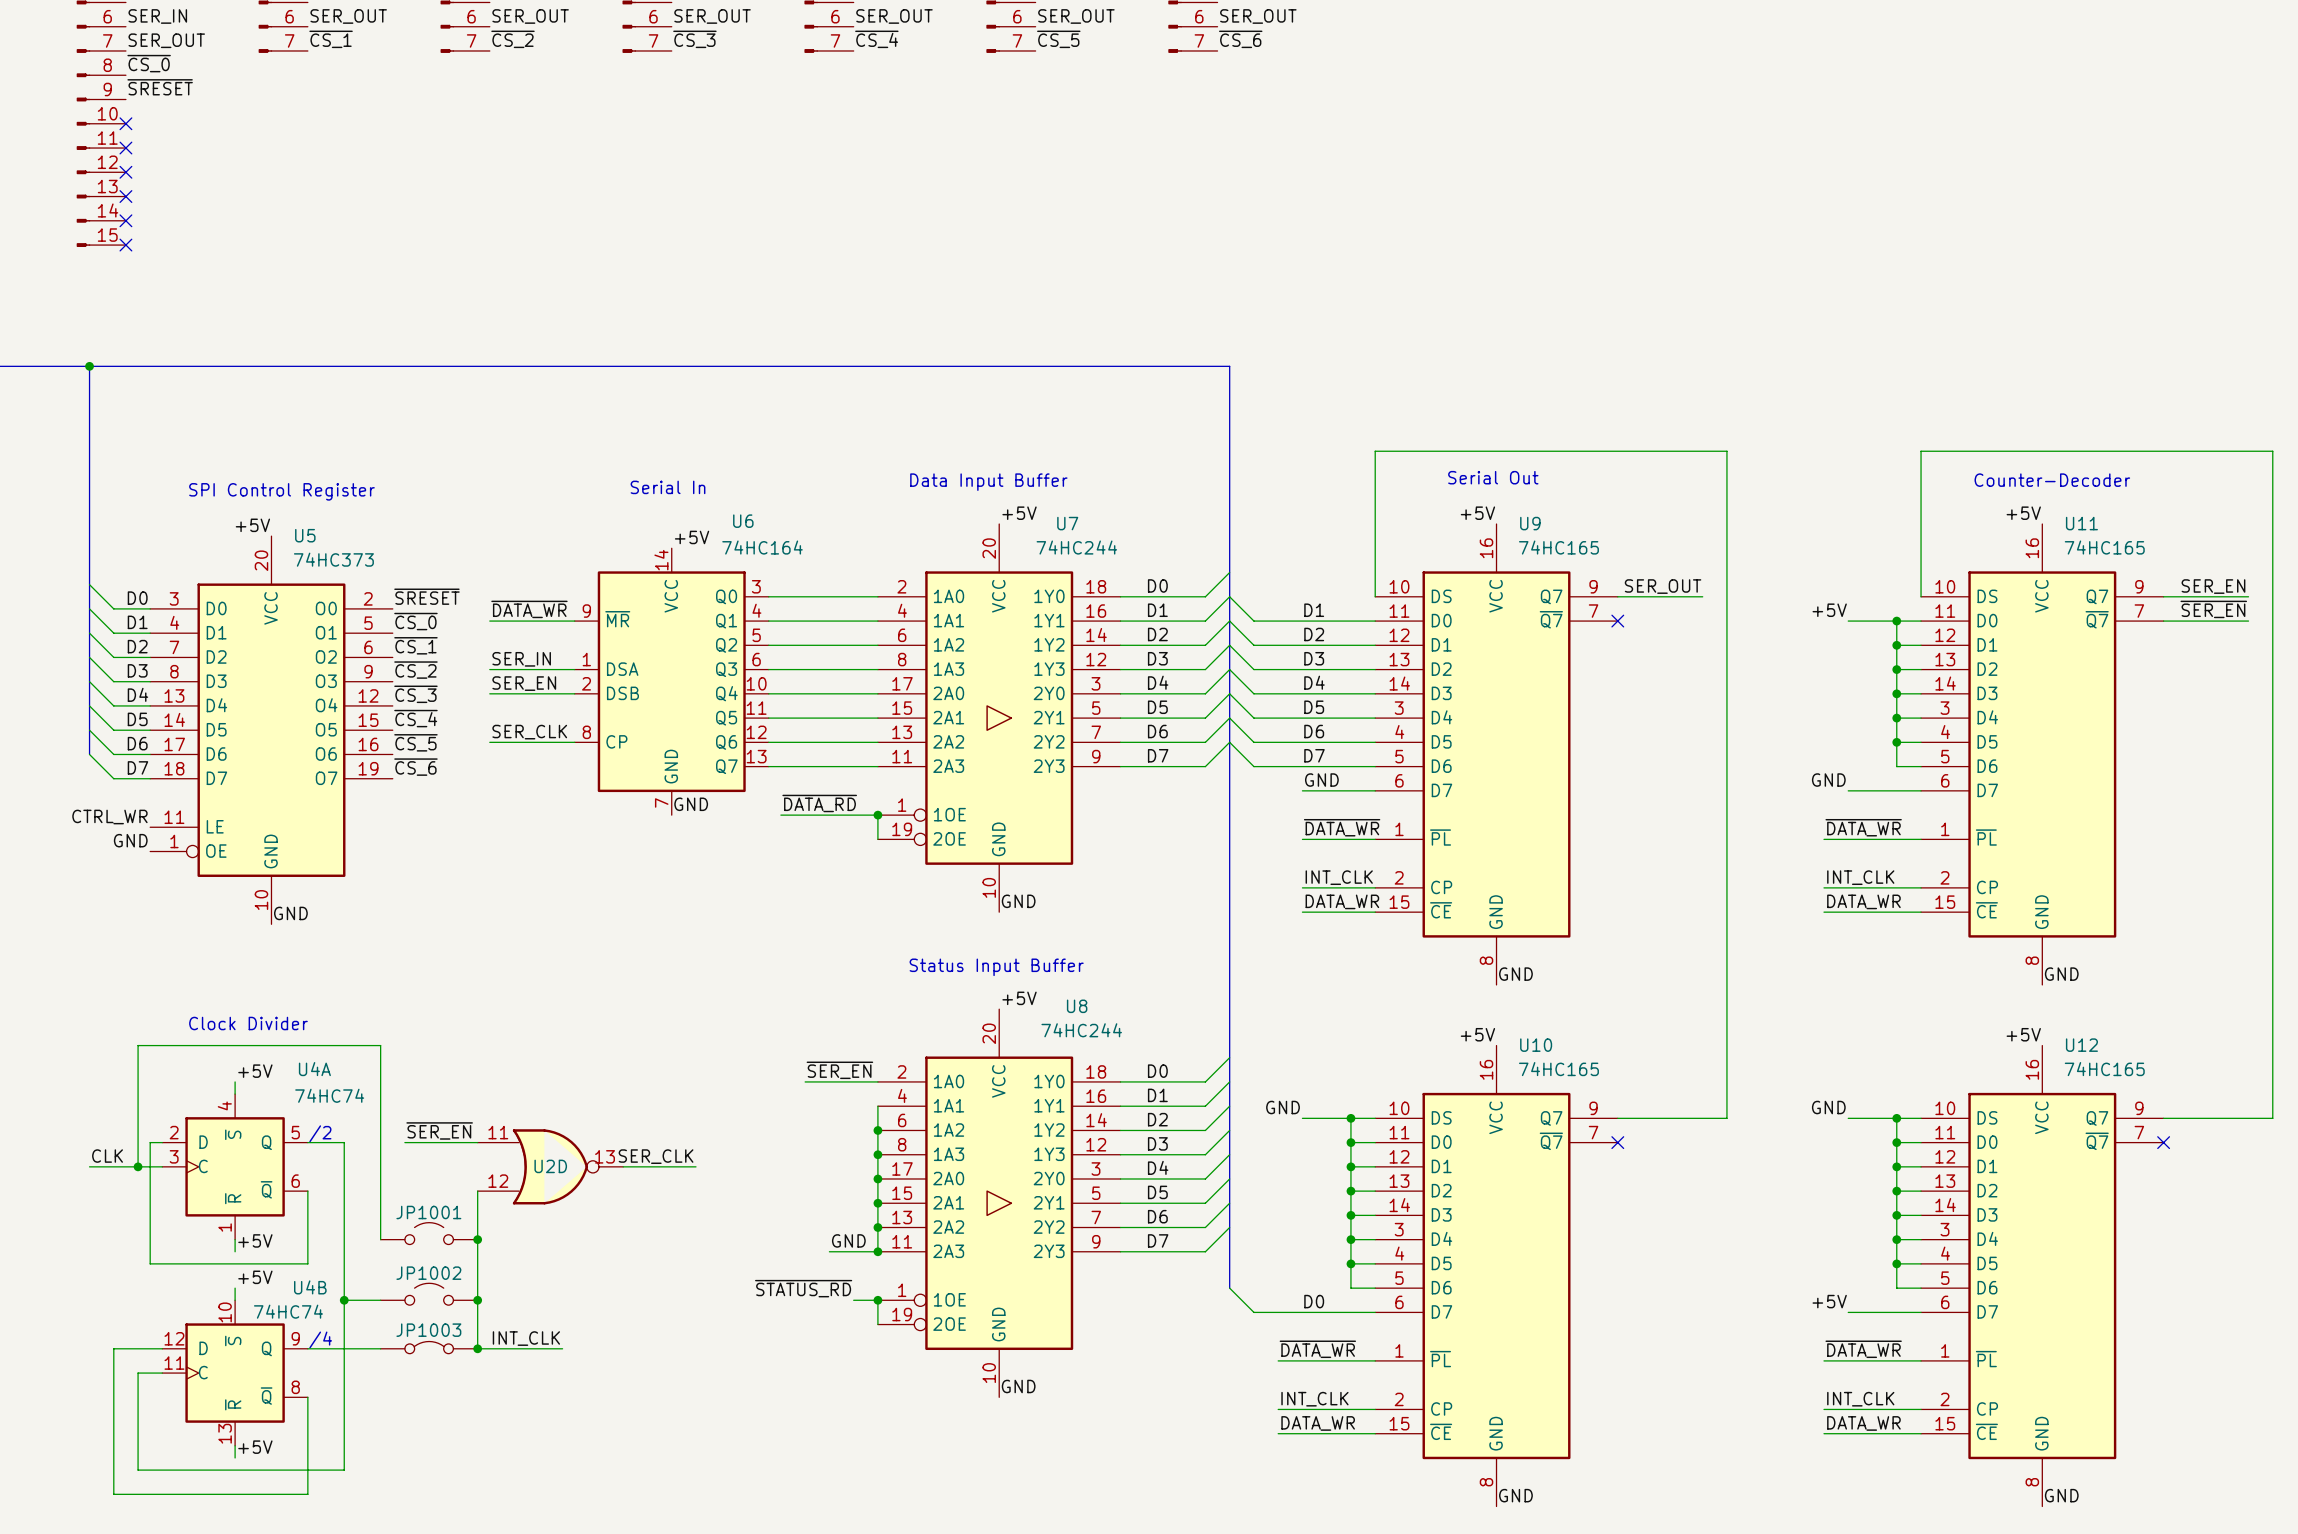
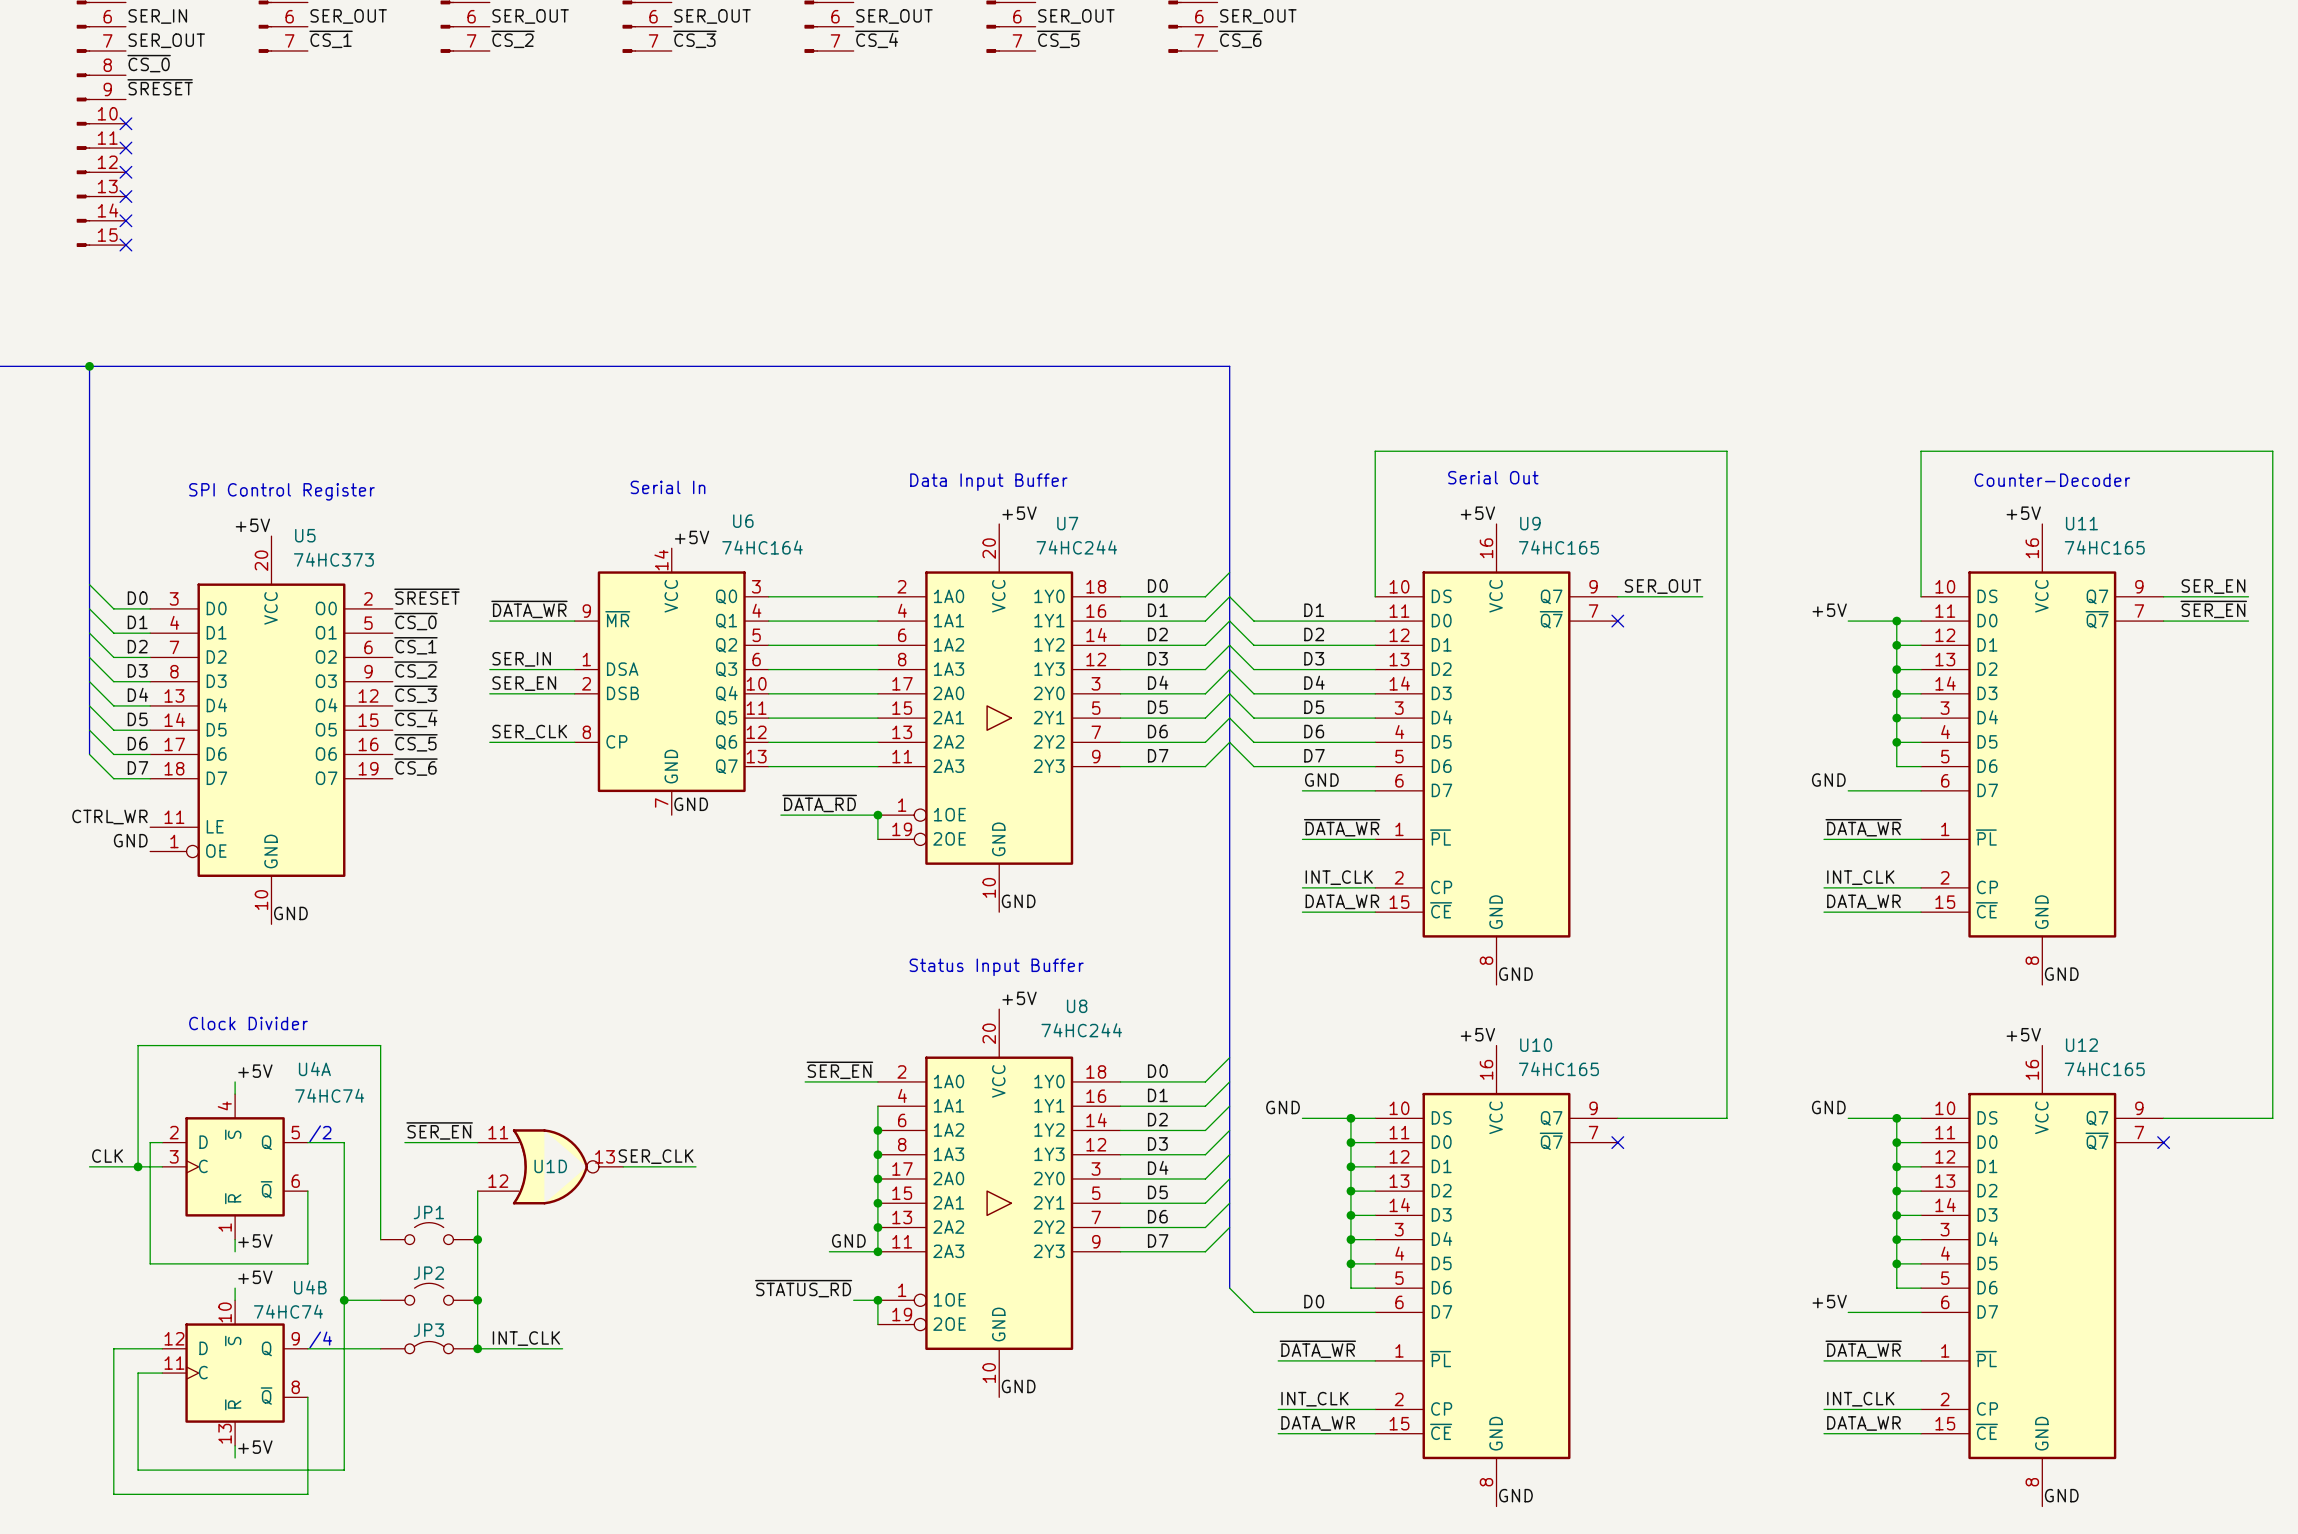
U2D name: U2D (550, 1166) -> U1D (550, 1166)
JP1001 name: JP1001 (428, 1212) -> JP1 (428, 1212)
JP1002 name: JP1002 (428, 1273) -> JP2 (428, 1273)
JP1003 name: JP1003 (428, 1330) -> JP3 (428, 1330)

